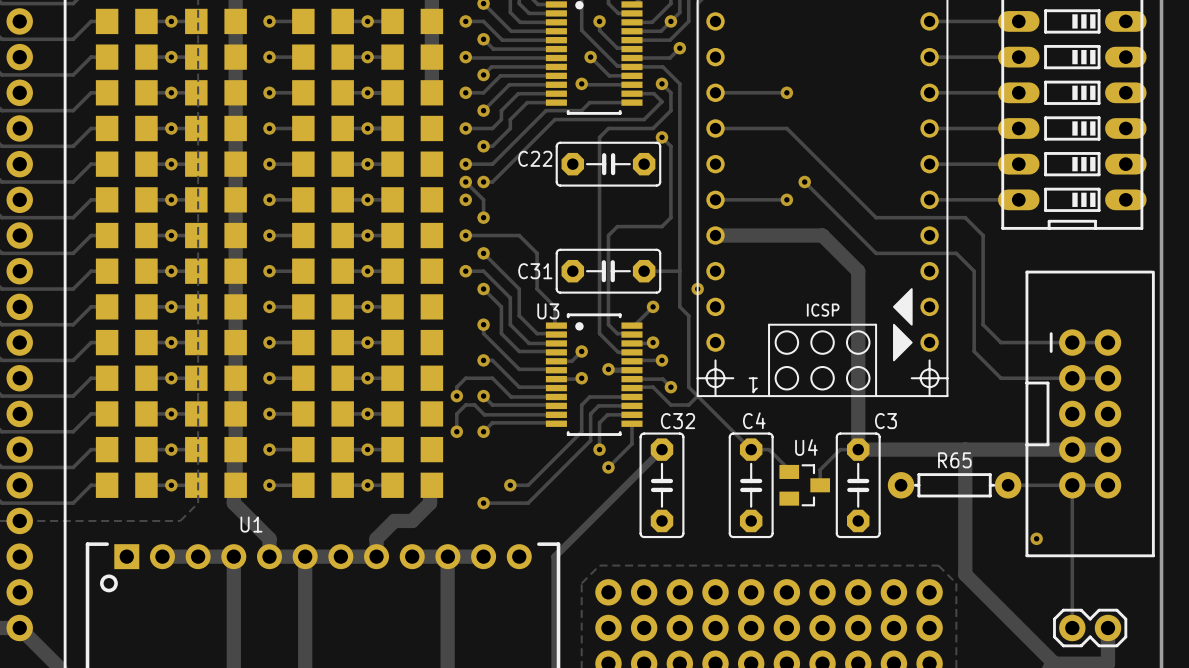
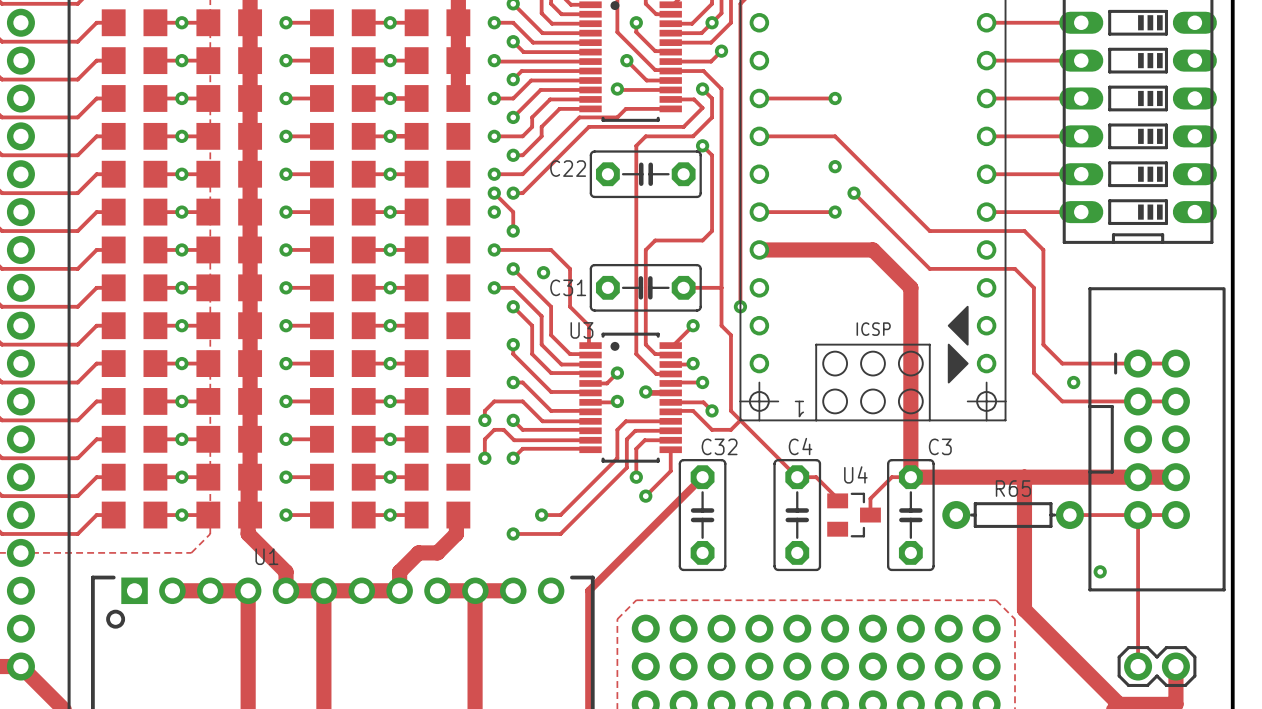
via: none -> (835, 166)
via: none -> (543, 272)
via: none -> (1073, 382)

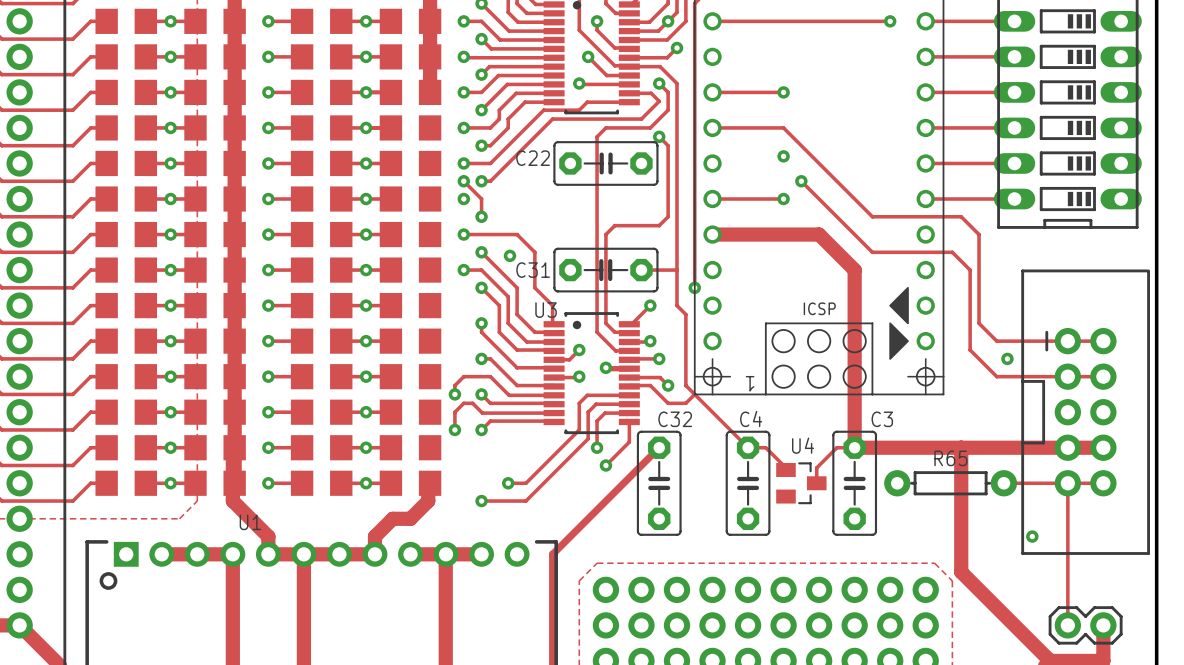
track: none -> (712, 21) (890, 21)
via: none -> (890, 21)

